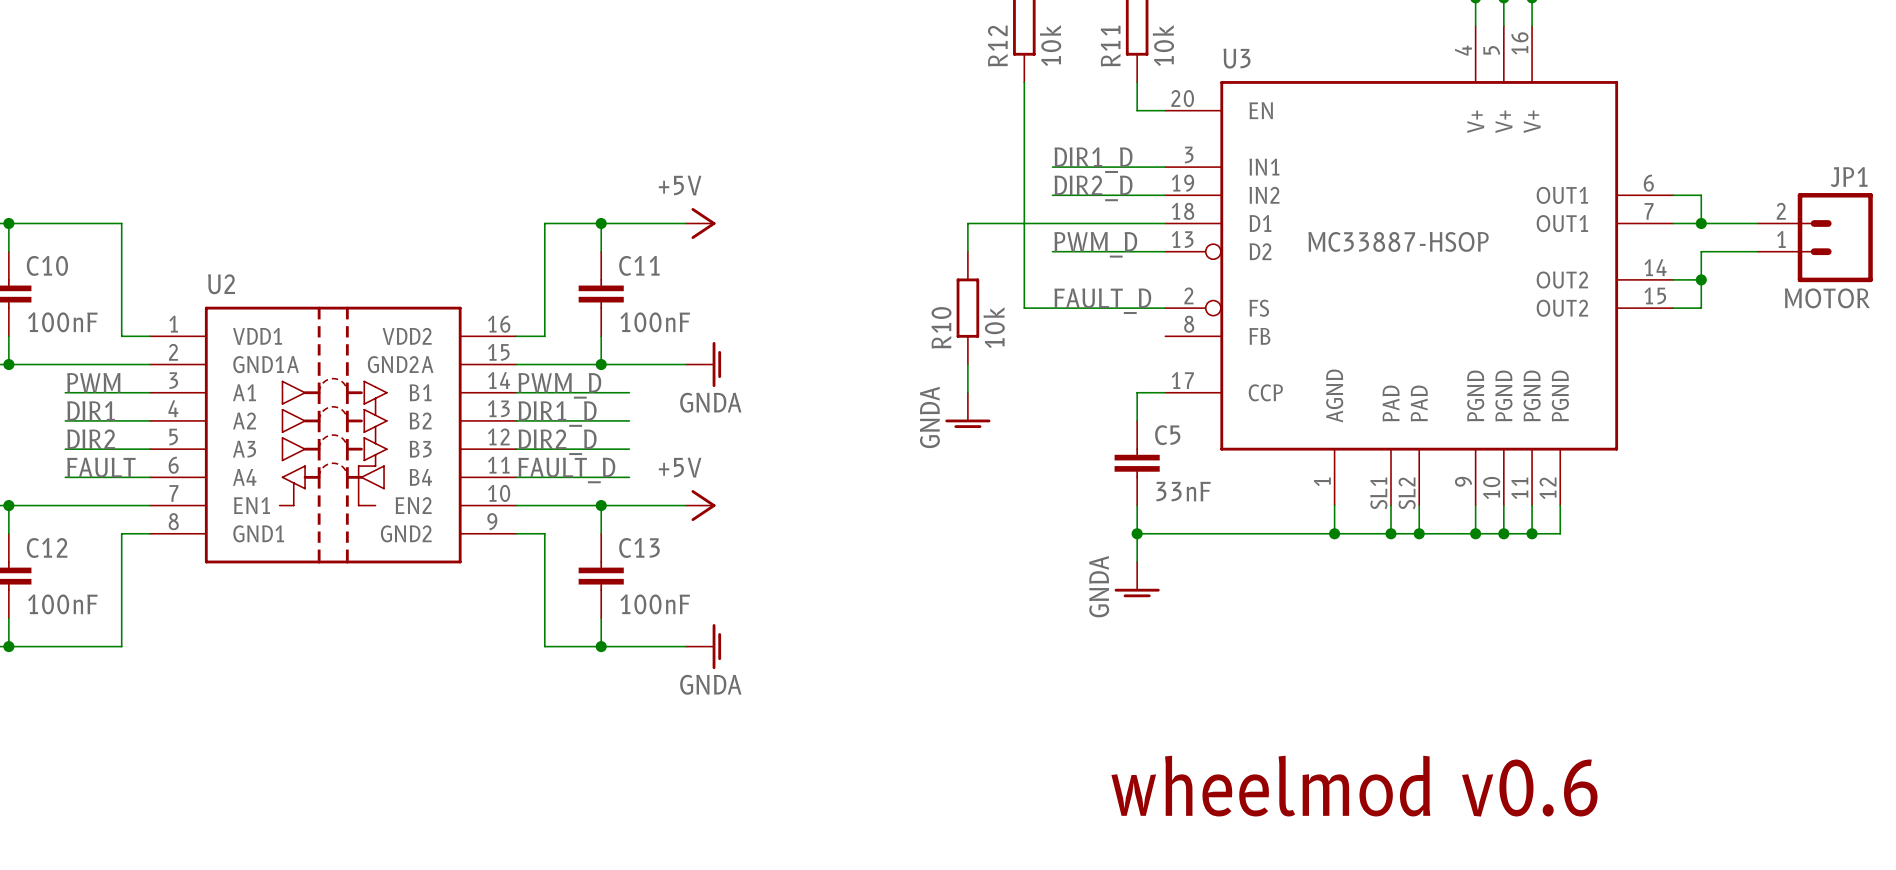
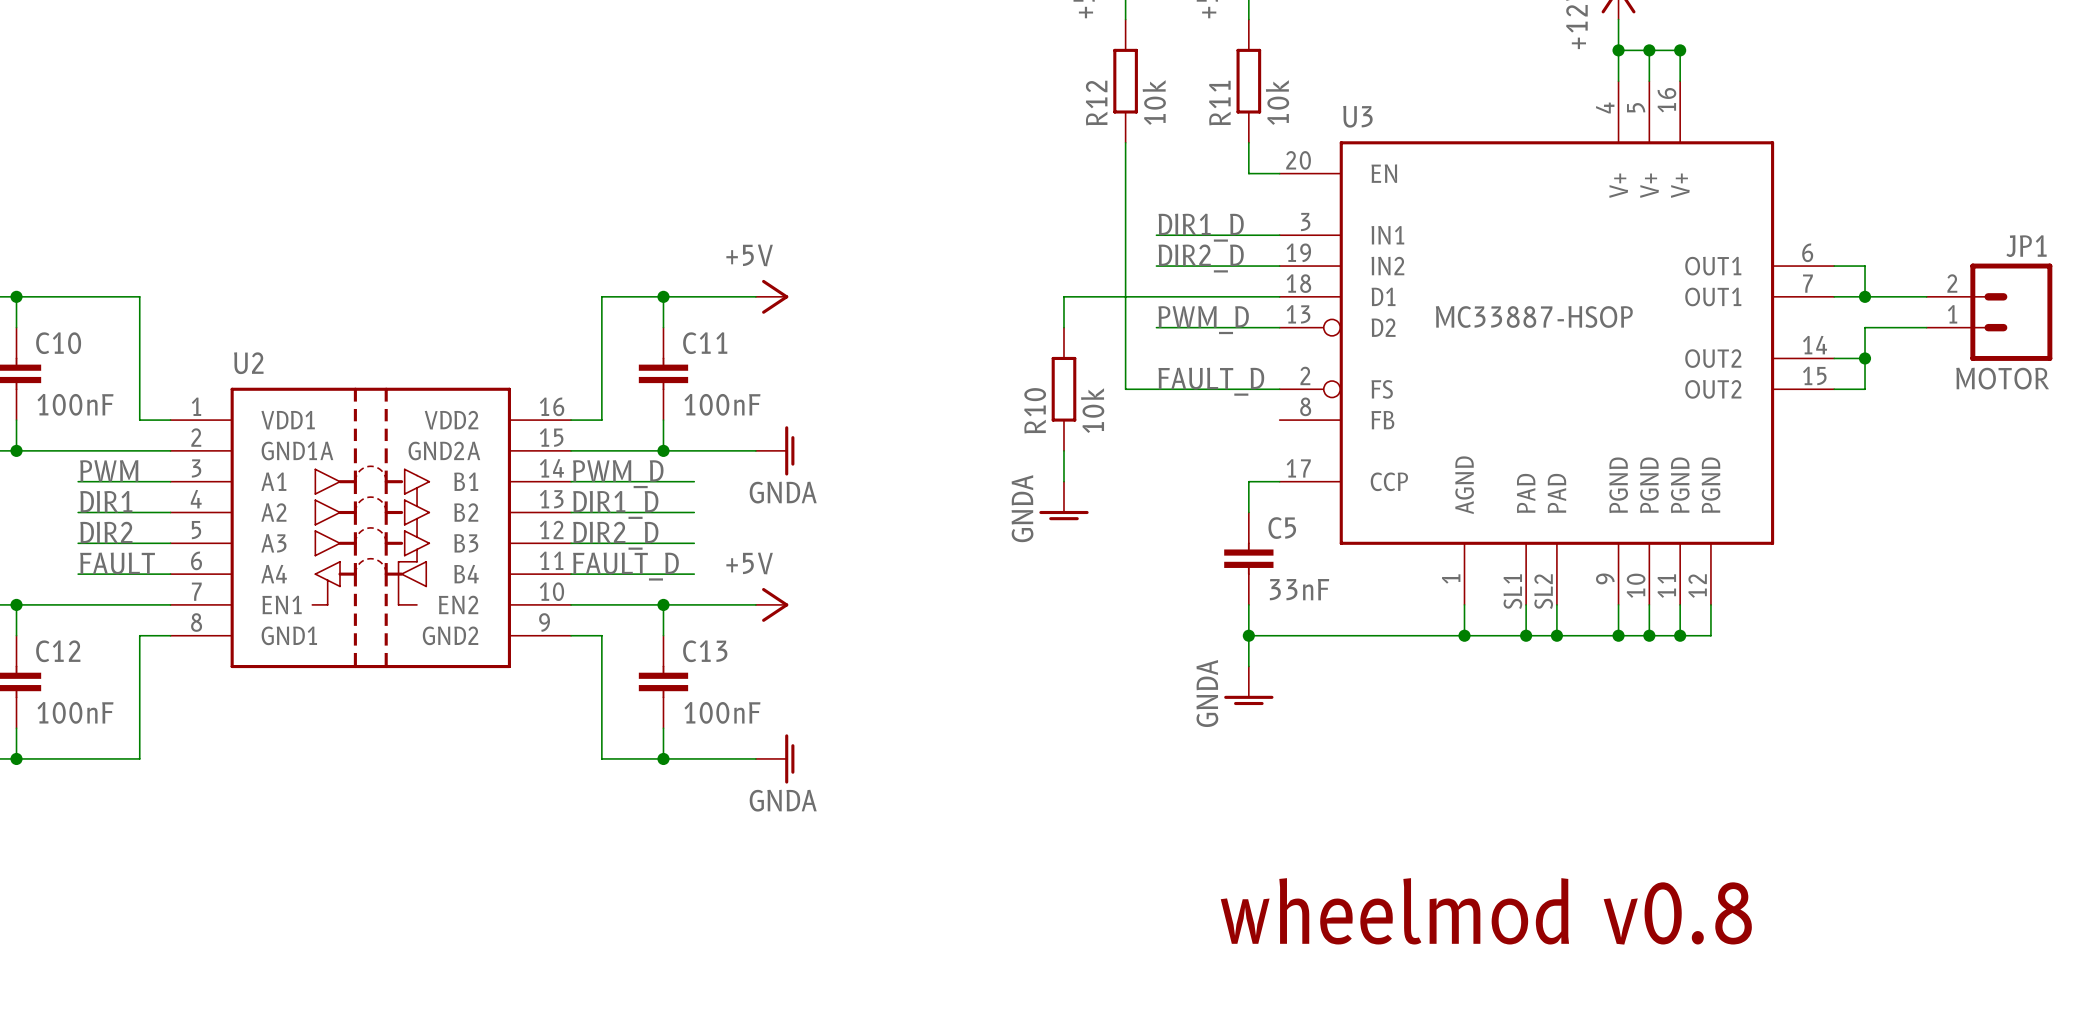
text: wheelmod v0.6 (1354, 786) -> wheelmod v0.8 (1486, 911)

